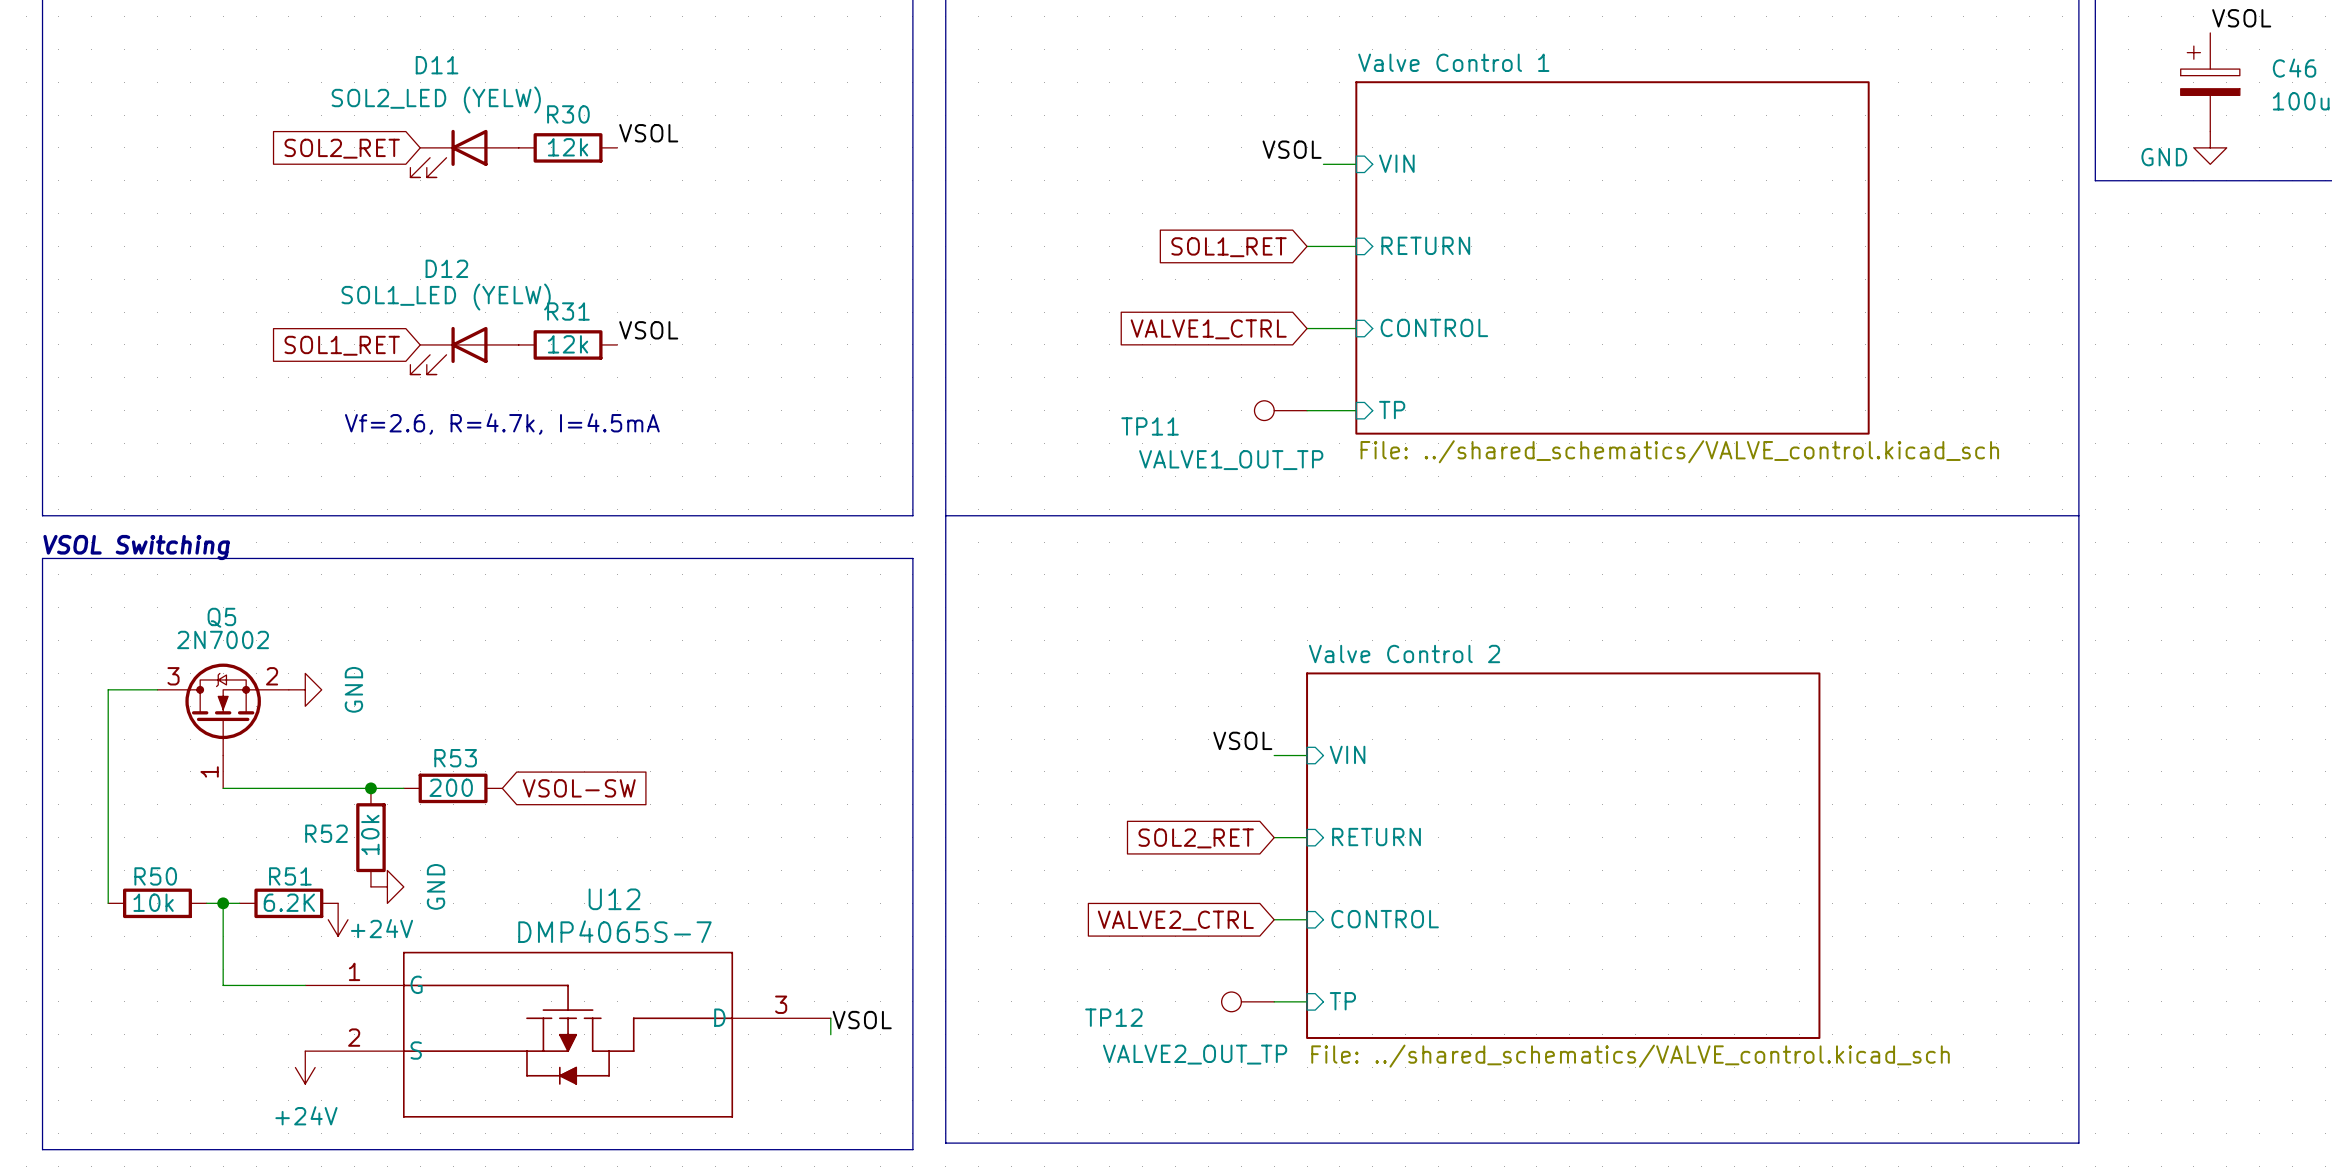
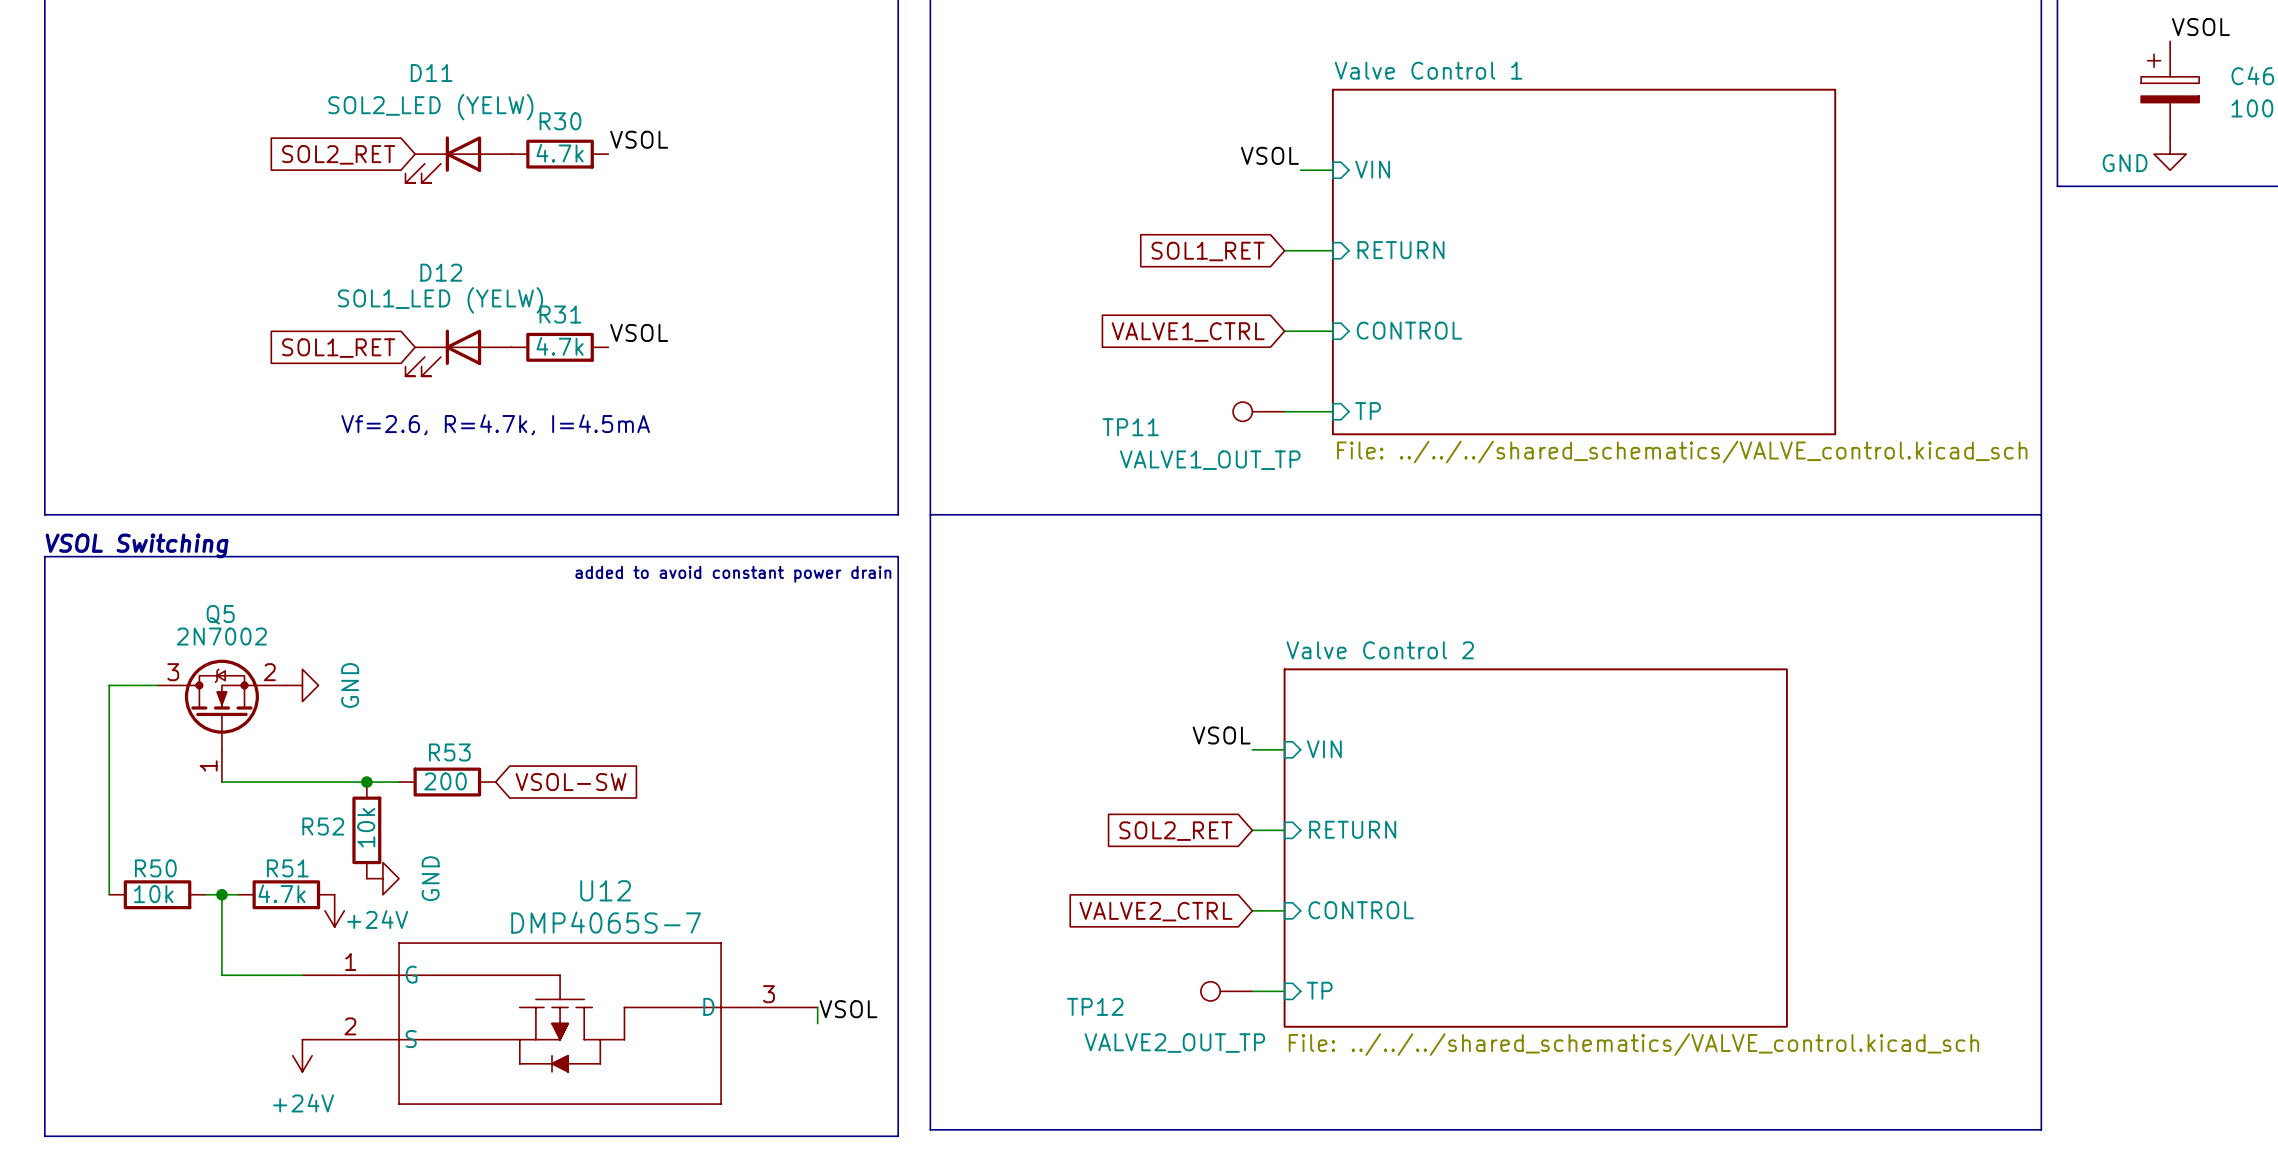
R30 value: 12k (568, 147) -> 4.7k (560, 153)
R31 value: 12k (568, 344) -> 4.7k (560, 346)
sheet Valve Control 1 value: File: ../shared_schematics/VALVE_control.kicad_sch (1679, 451) -> File: ../../../shared_schematics/VALVE_control.kicad_sch (1682, 452)
text: none -> added to avoid constant power drain (733, 574)
R51 value: 6.2K (289, 902) -> 4.7k (281, 893)
sheet Valve Control 2 value: File: ../shared_schematics/VALVE_control.kicad_sch (1630, 1056) -> File: ../../../shared_schematics/VALVE_control.kicad_sch (1633, 1044)

